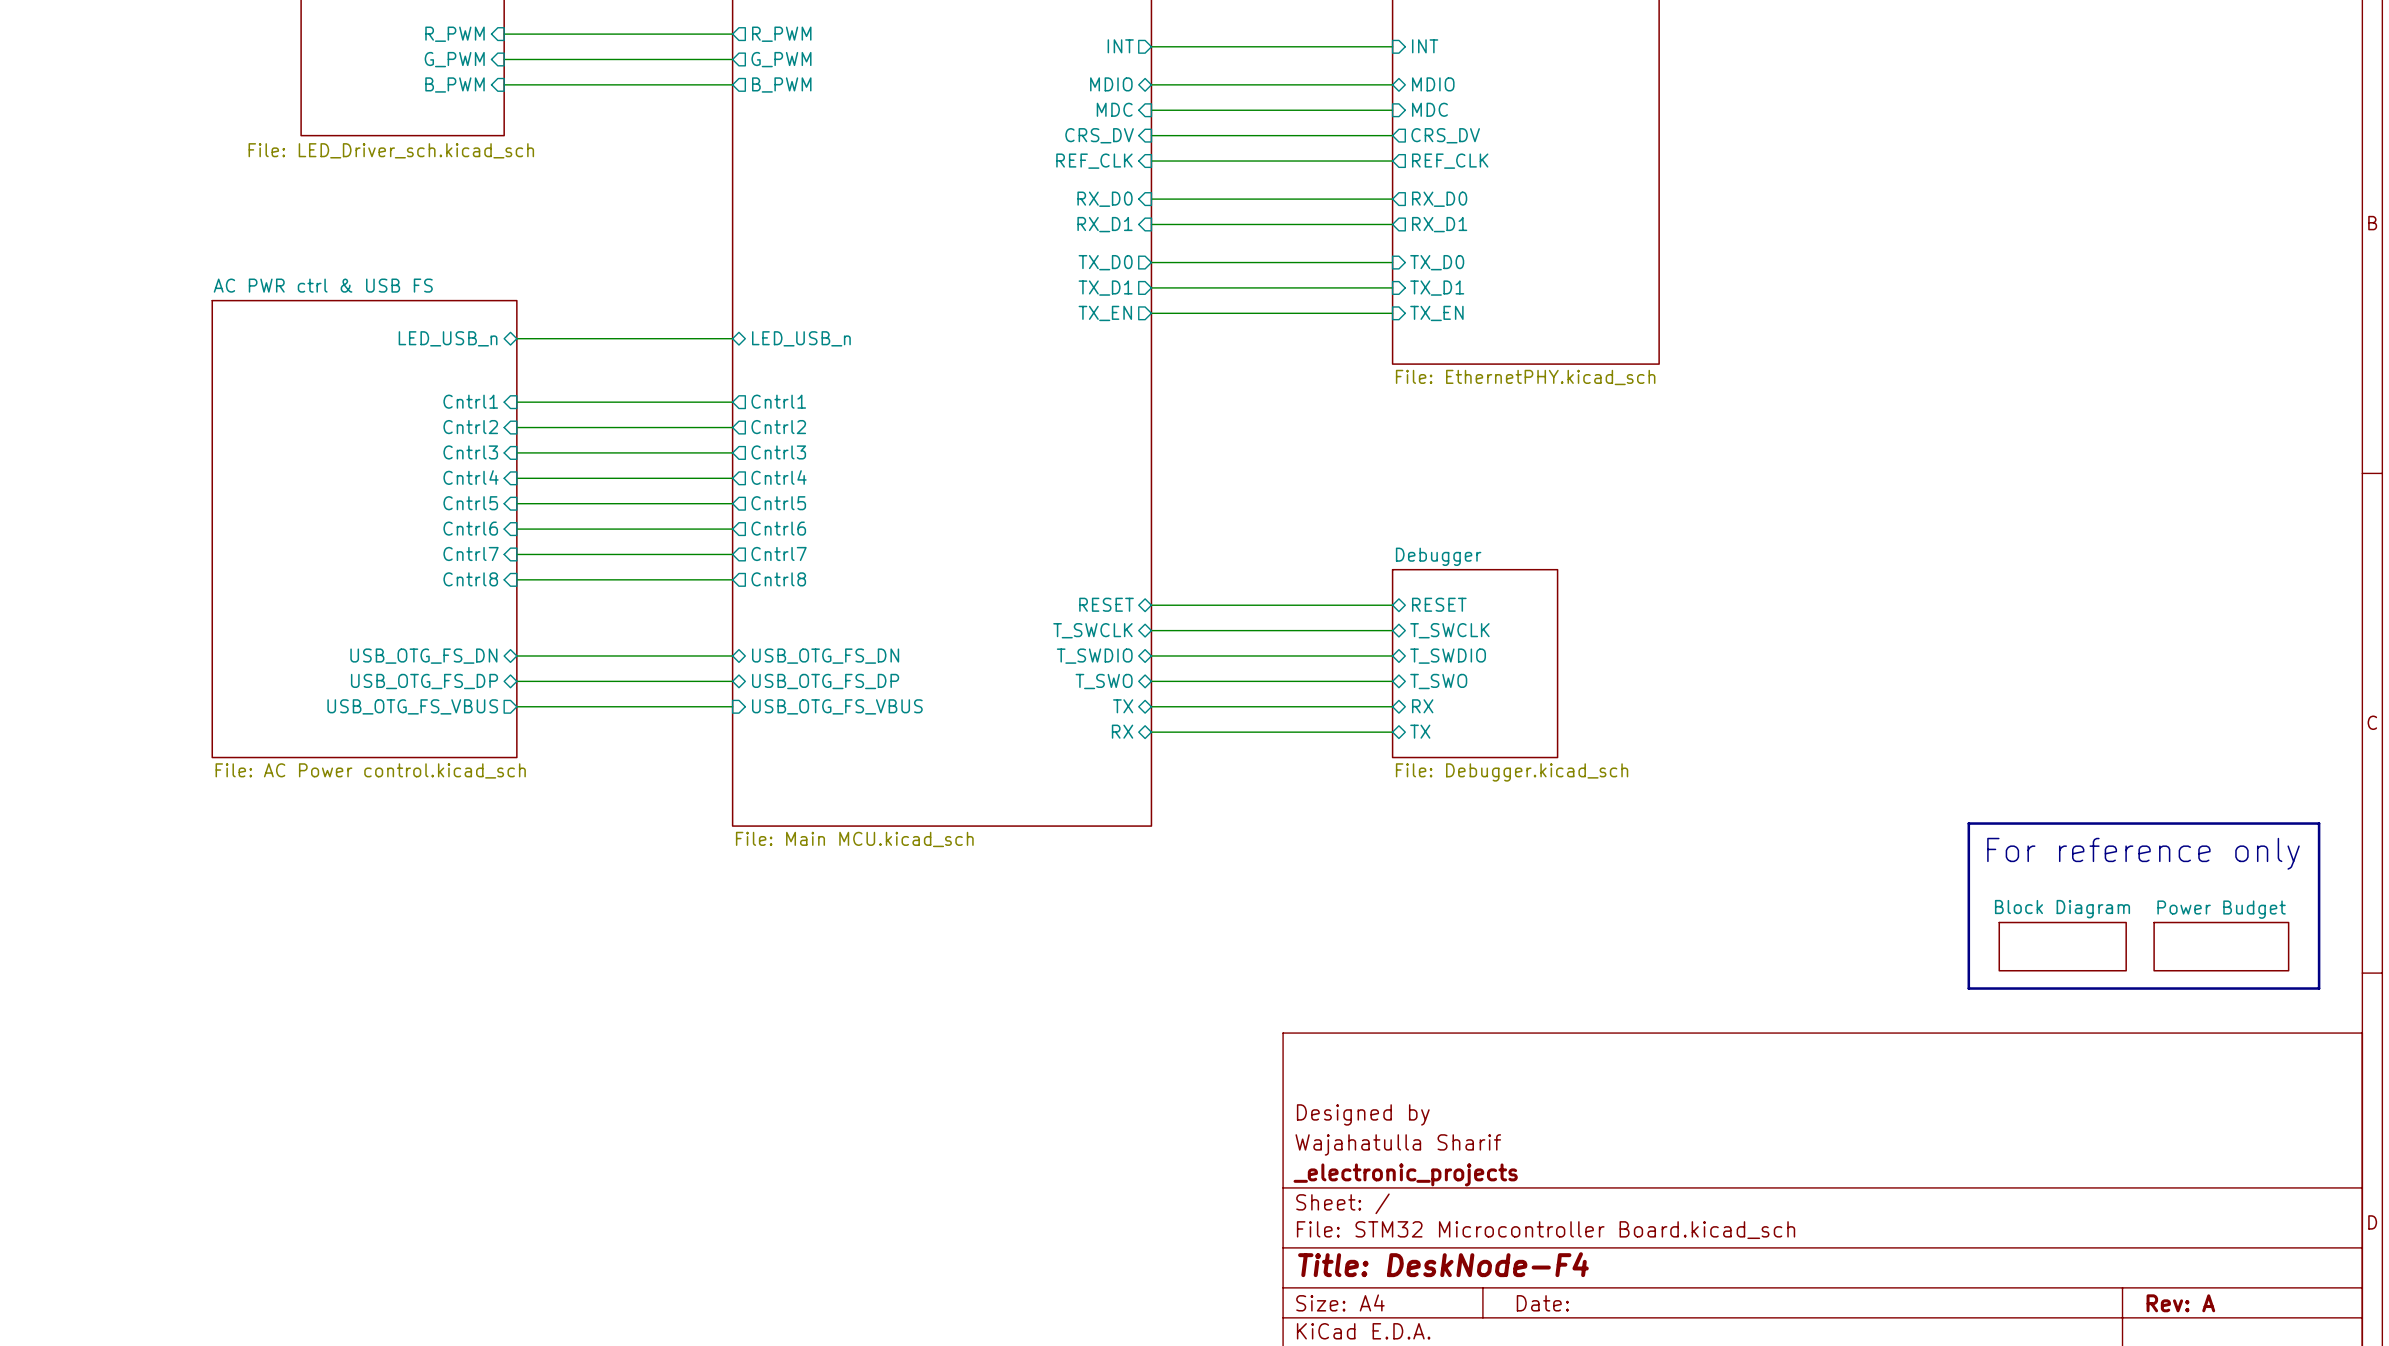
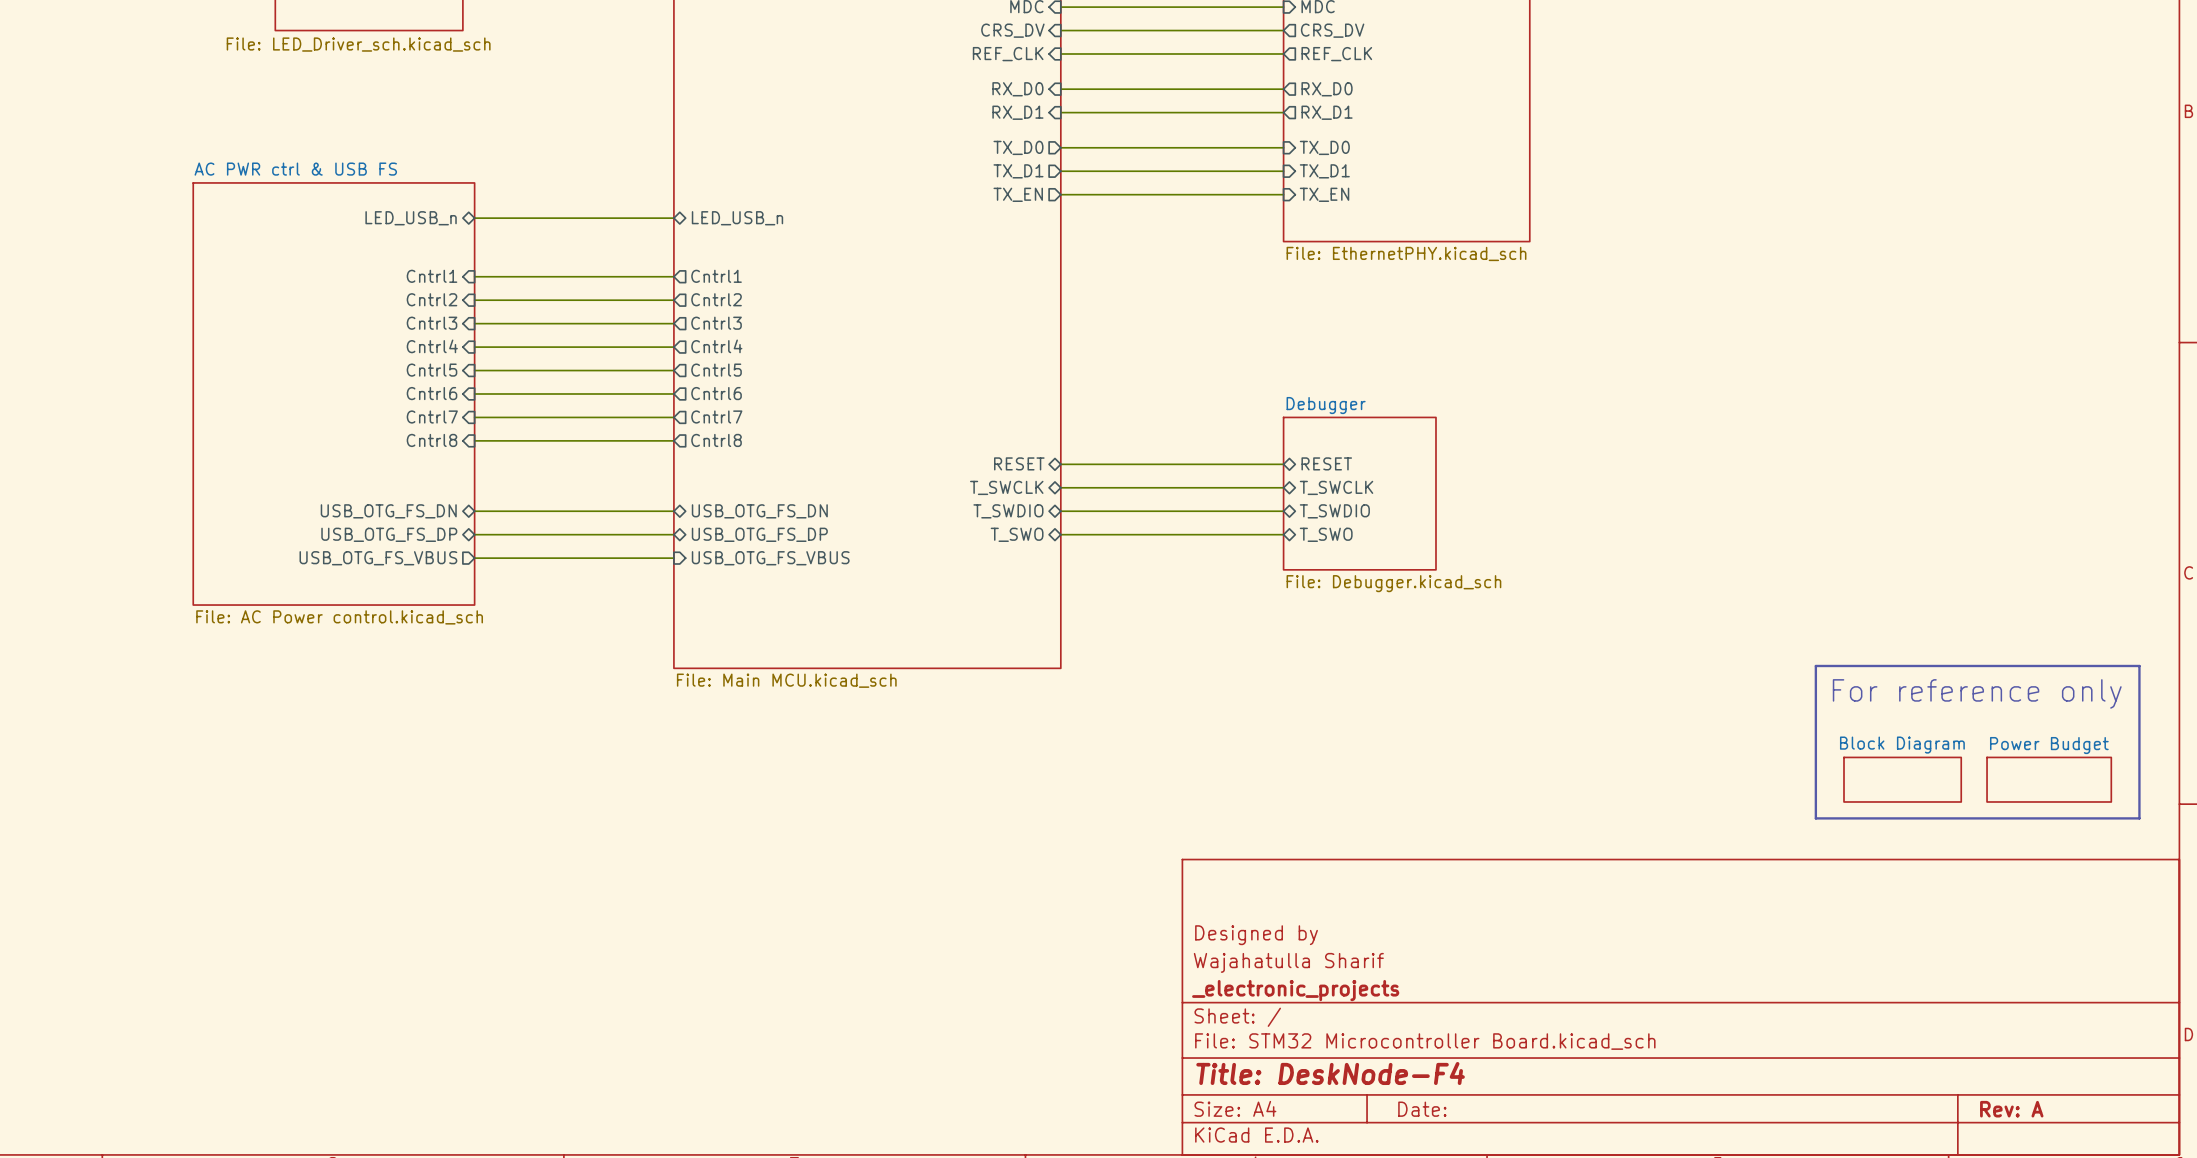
sheet Debugger: none -> File: Debugger.kicad_sch (1359, 493)
sheet Debugger: File: Debugger.kicad_sch (1475, 663) -> none
sheet pin: TX (1123, 706) -> none
wire: (1151, 706) (1392, 706) -> none
sheet pin: RX (1422, 706) -> none
sheet pin: RX (1122, 731) -> none
sheet pin: TX (1420, 731) -> none
wire: (1151, 732) (1392, 732) -> none

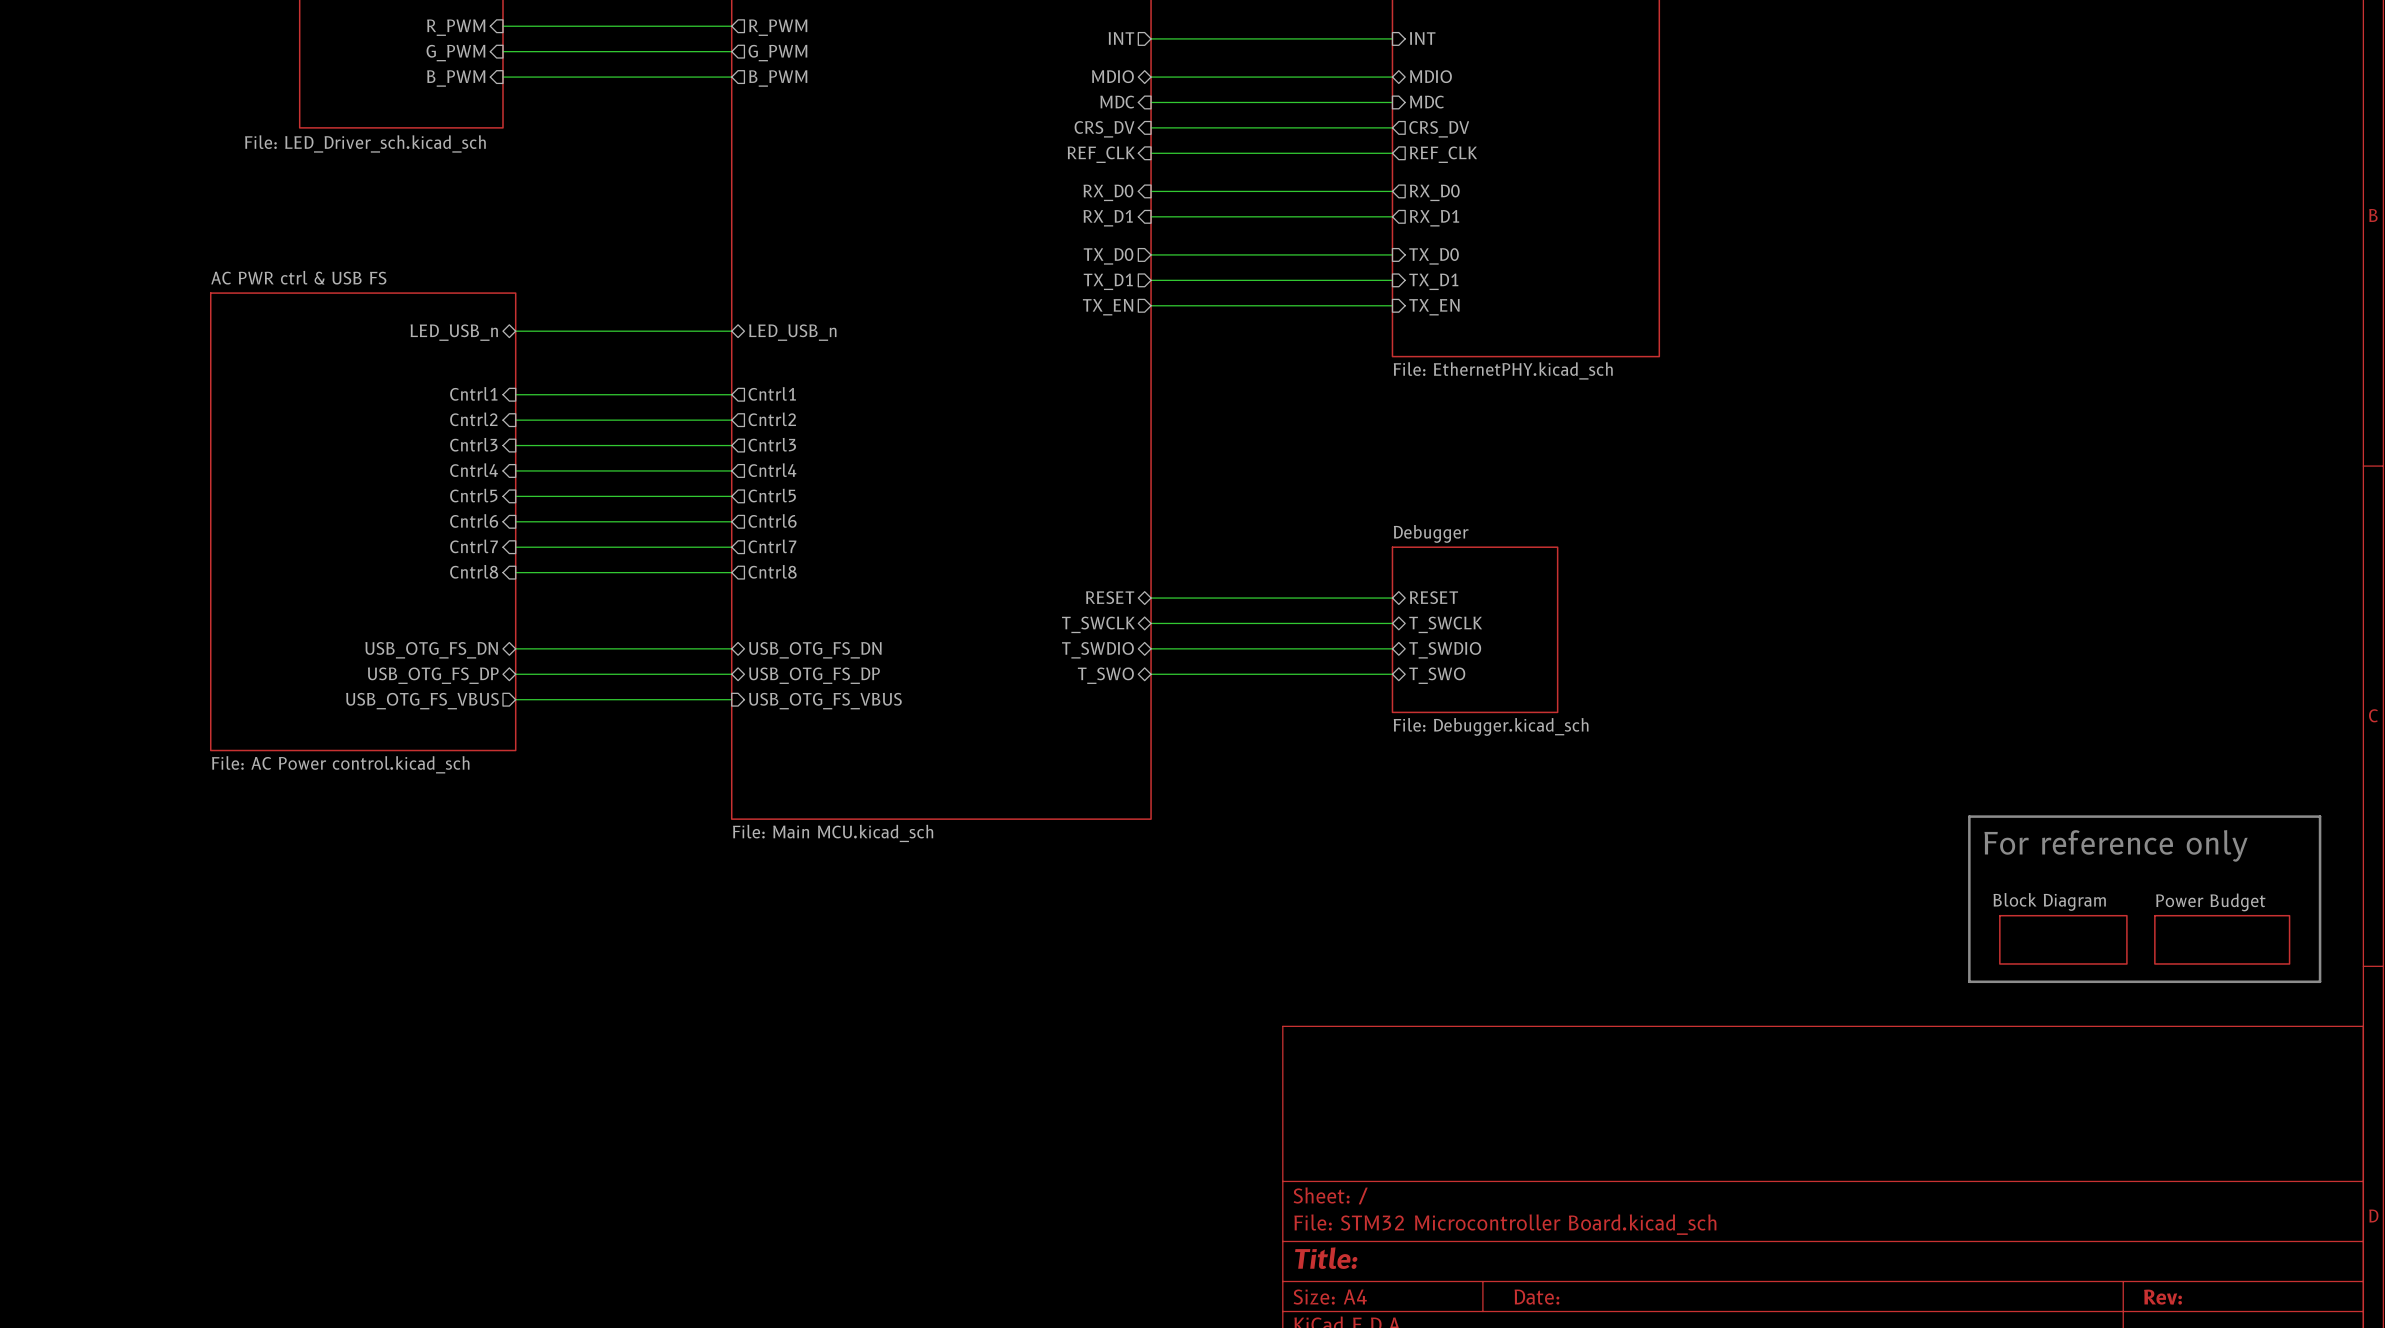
title block: Designed by (1256, 935) -> none
title block: Wajahatulla Sharif (1288, 962) -> none
title block: _electronic_projects (1295, 990) -> none
title block: Title: DeskNode-F4 (1330, 1073) -> Title: (1326, 1258)
title block: Rev: A (2011, 1109) -> Rev: (2163, 1297)

